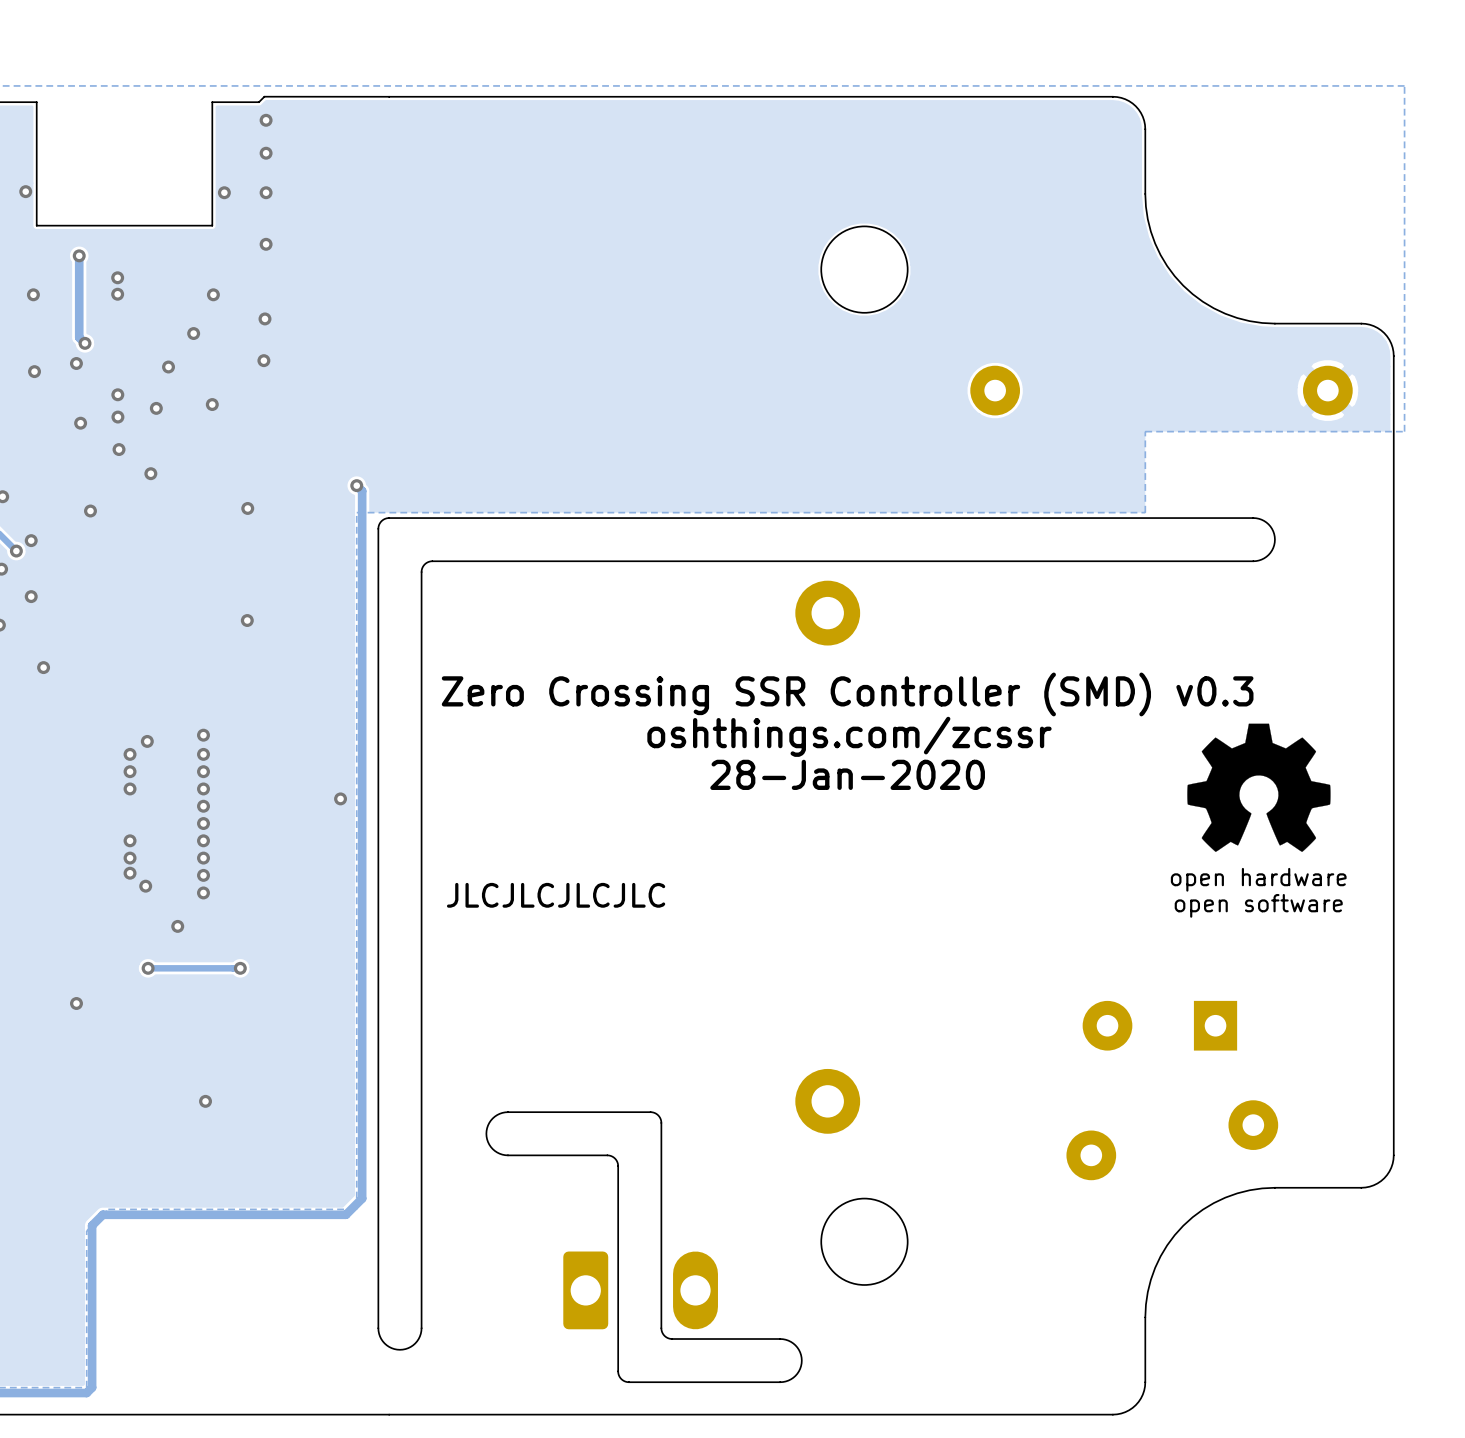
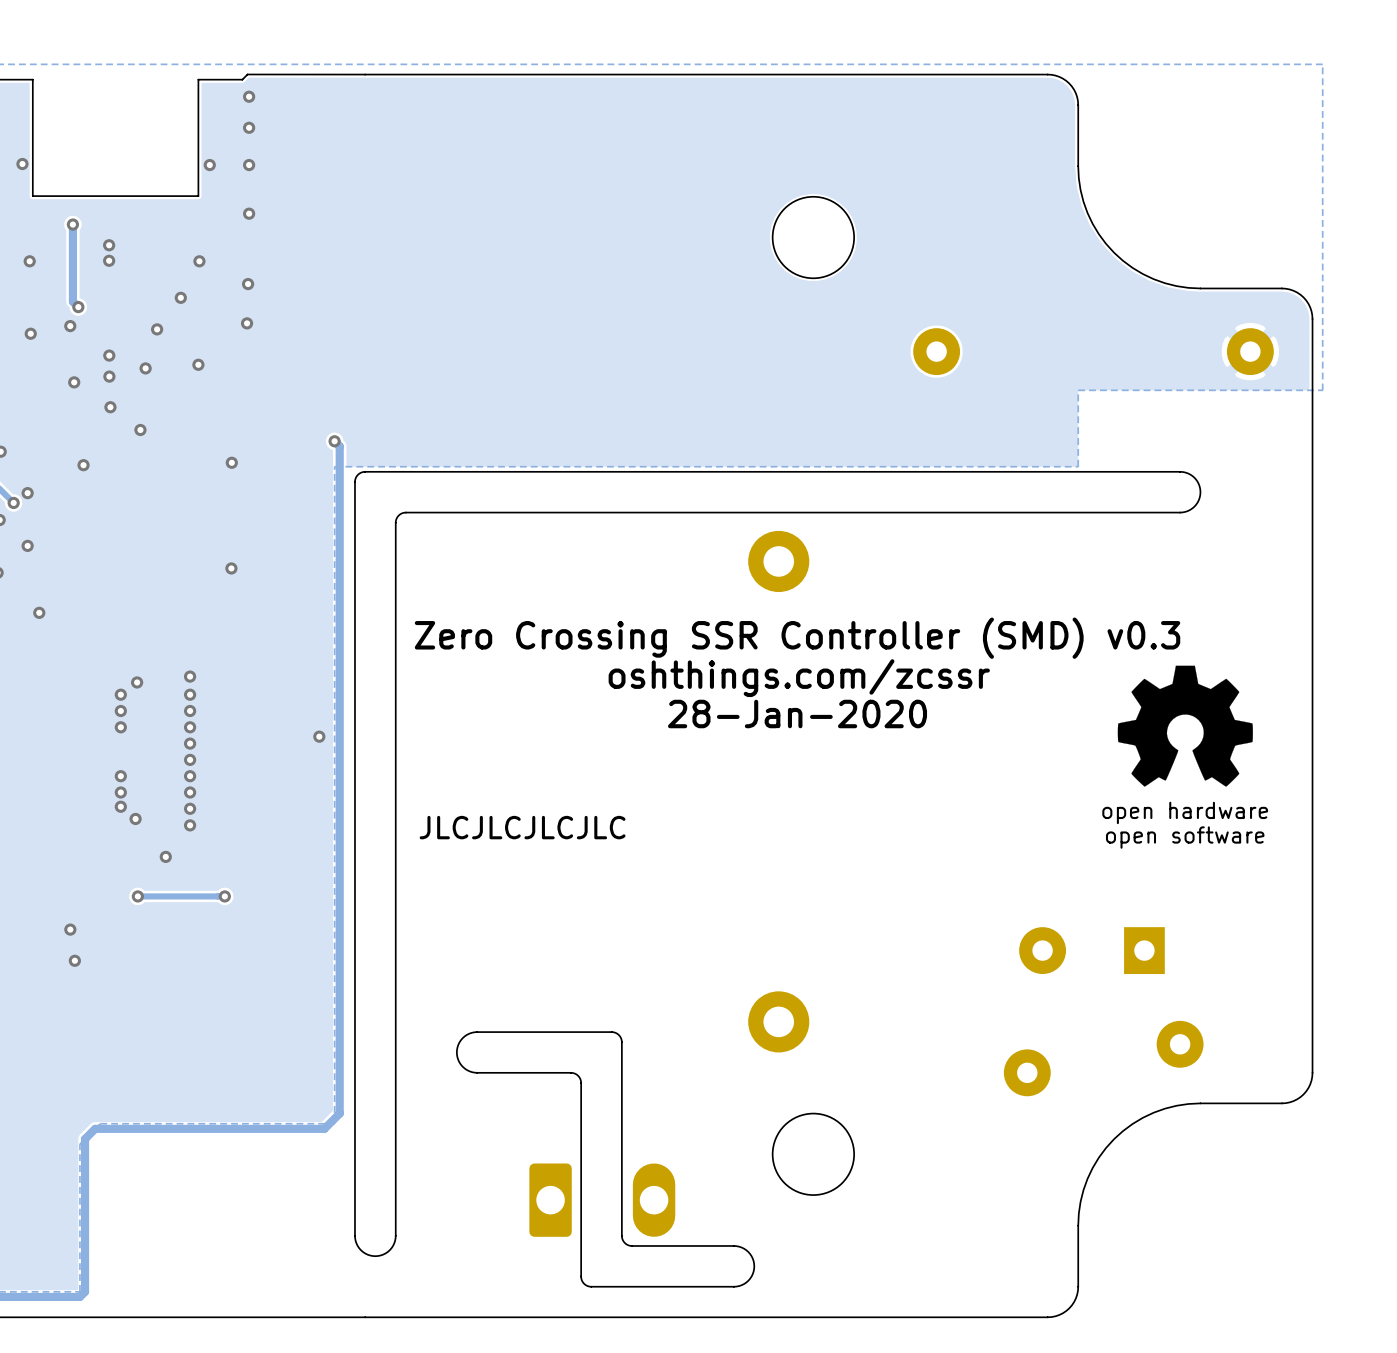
via: none -> (74, 960)
via: (205, 1101) -> none

